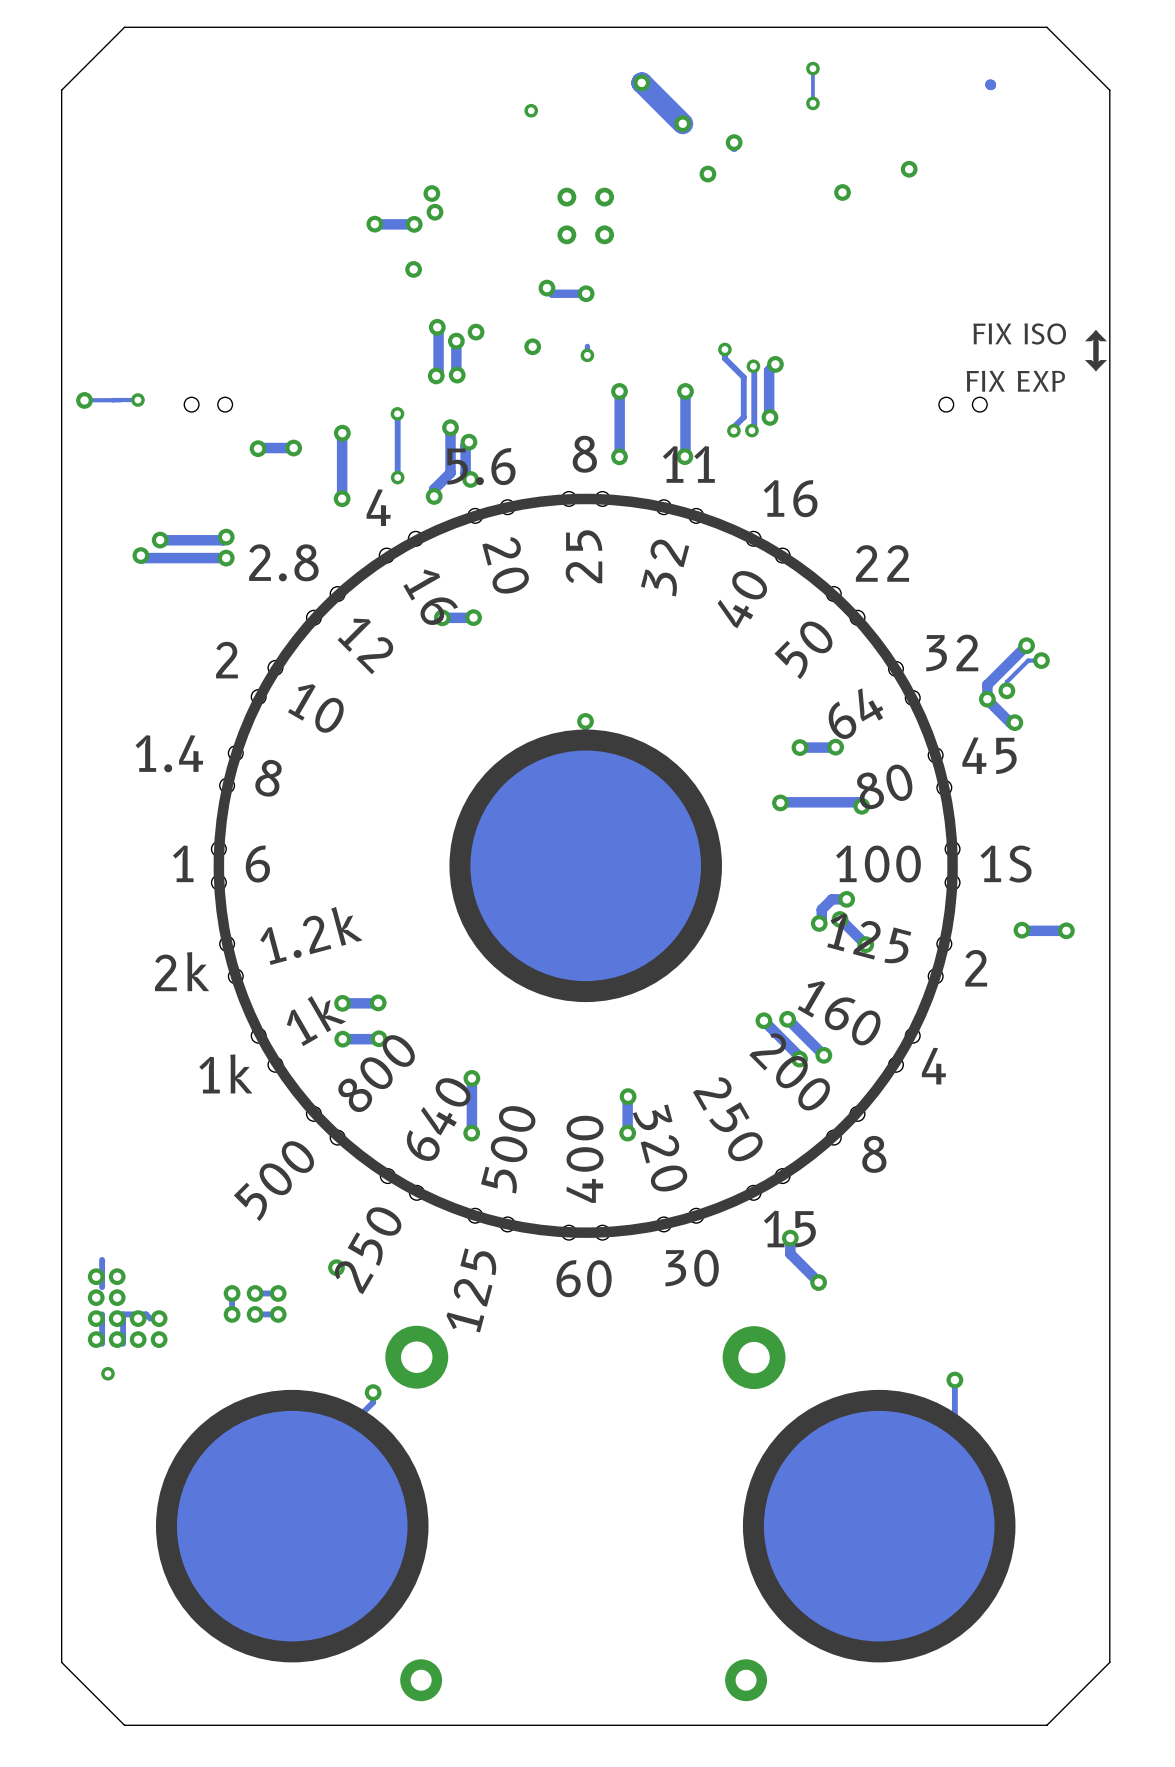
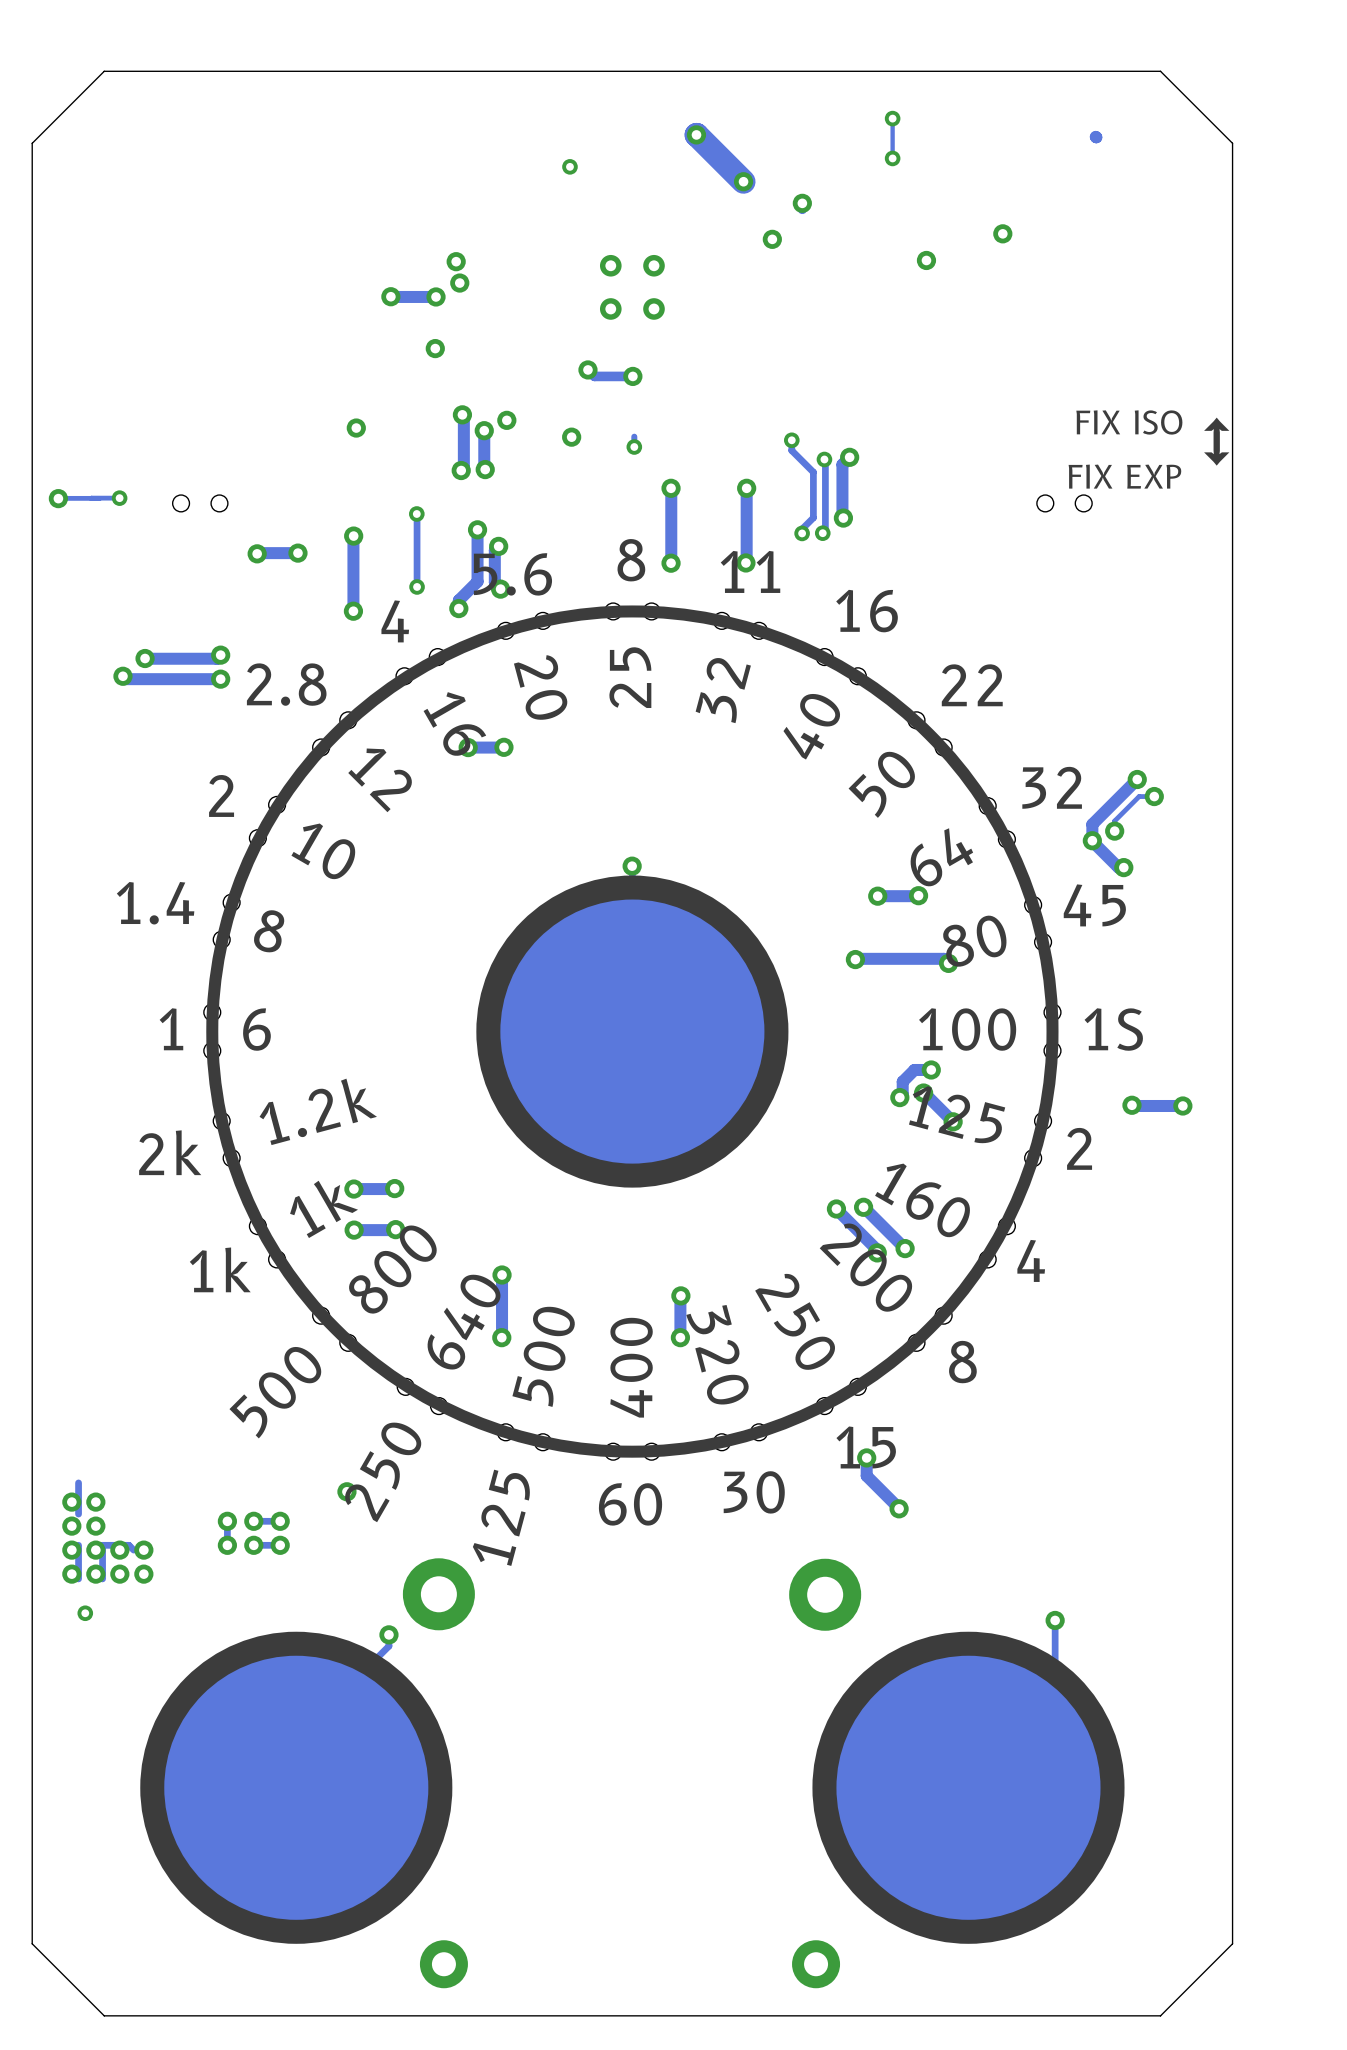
via: none -> (356, 428)

